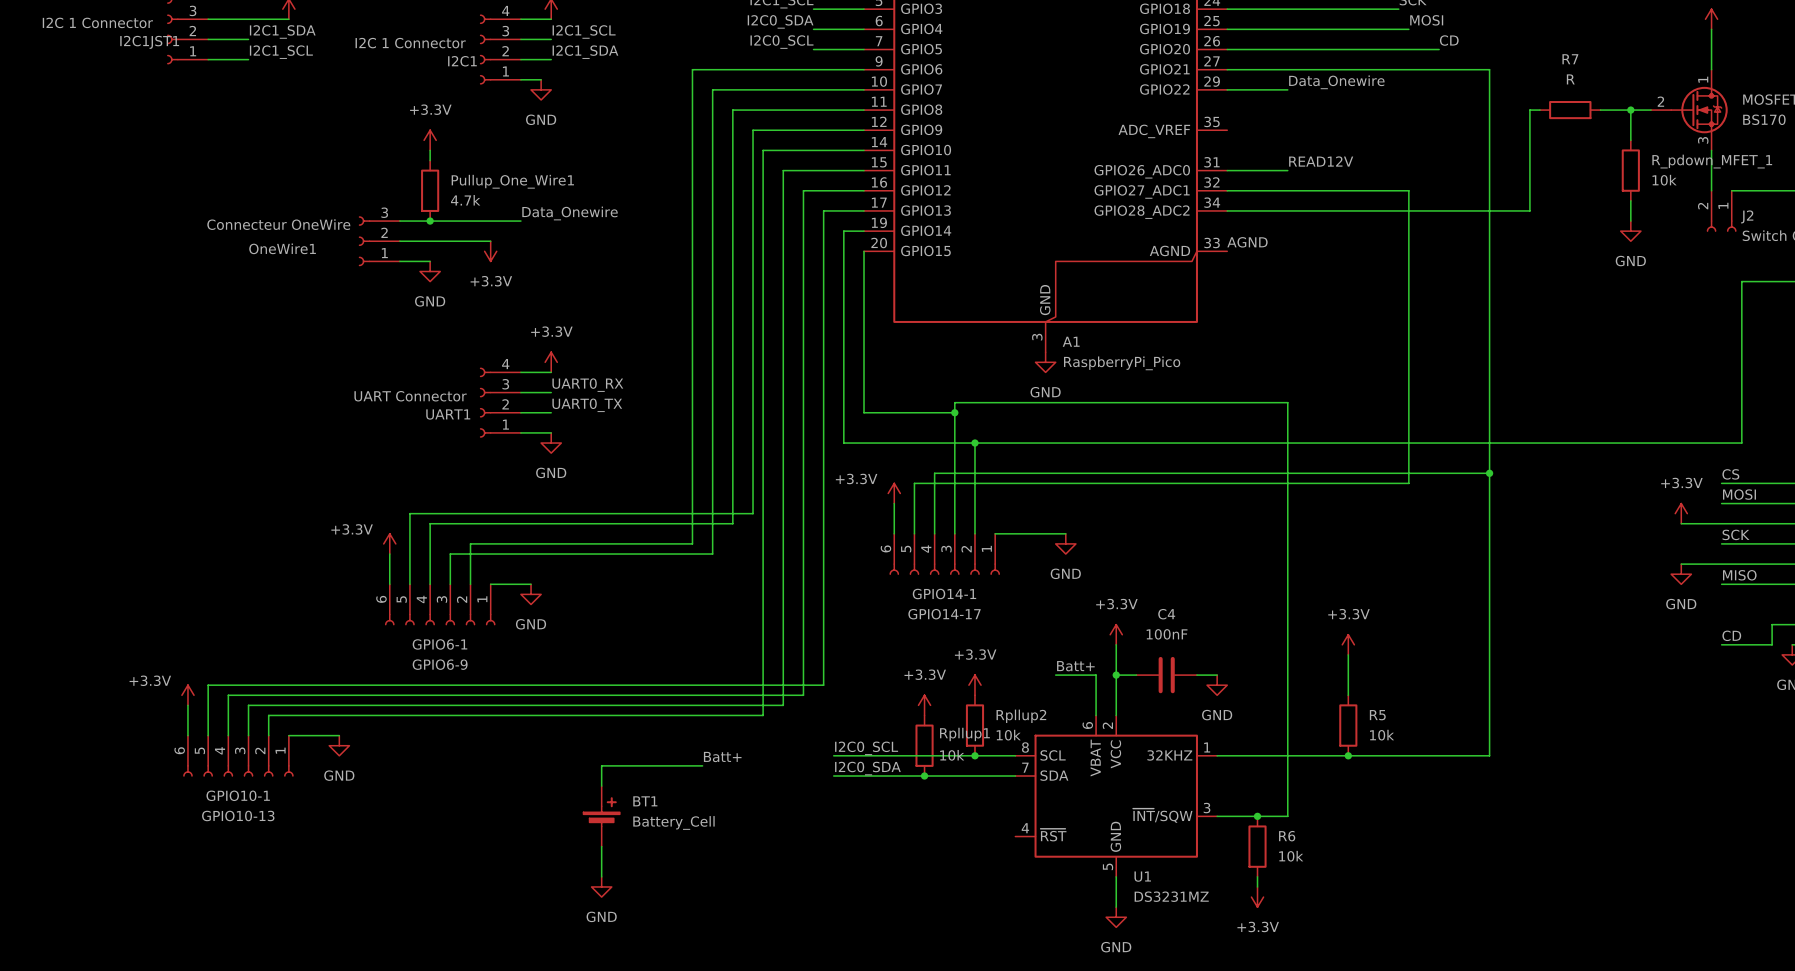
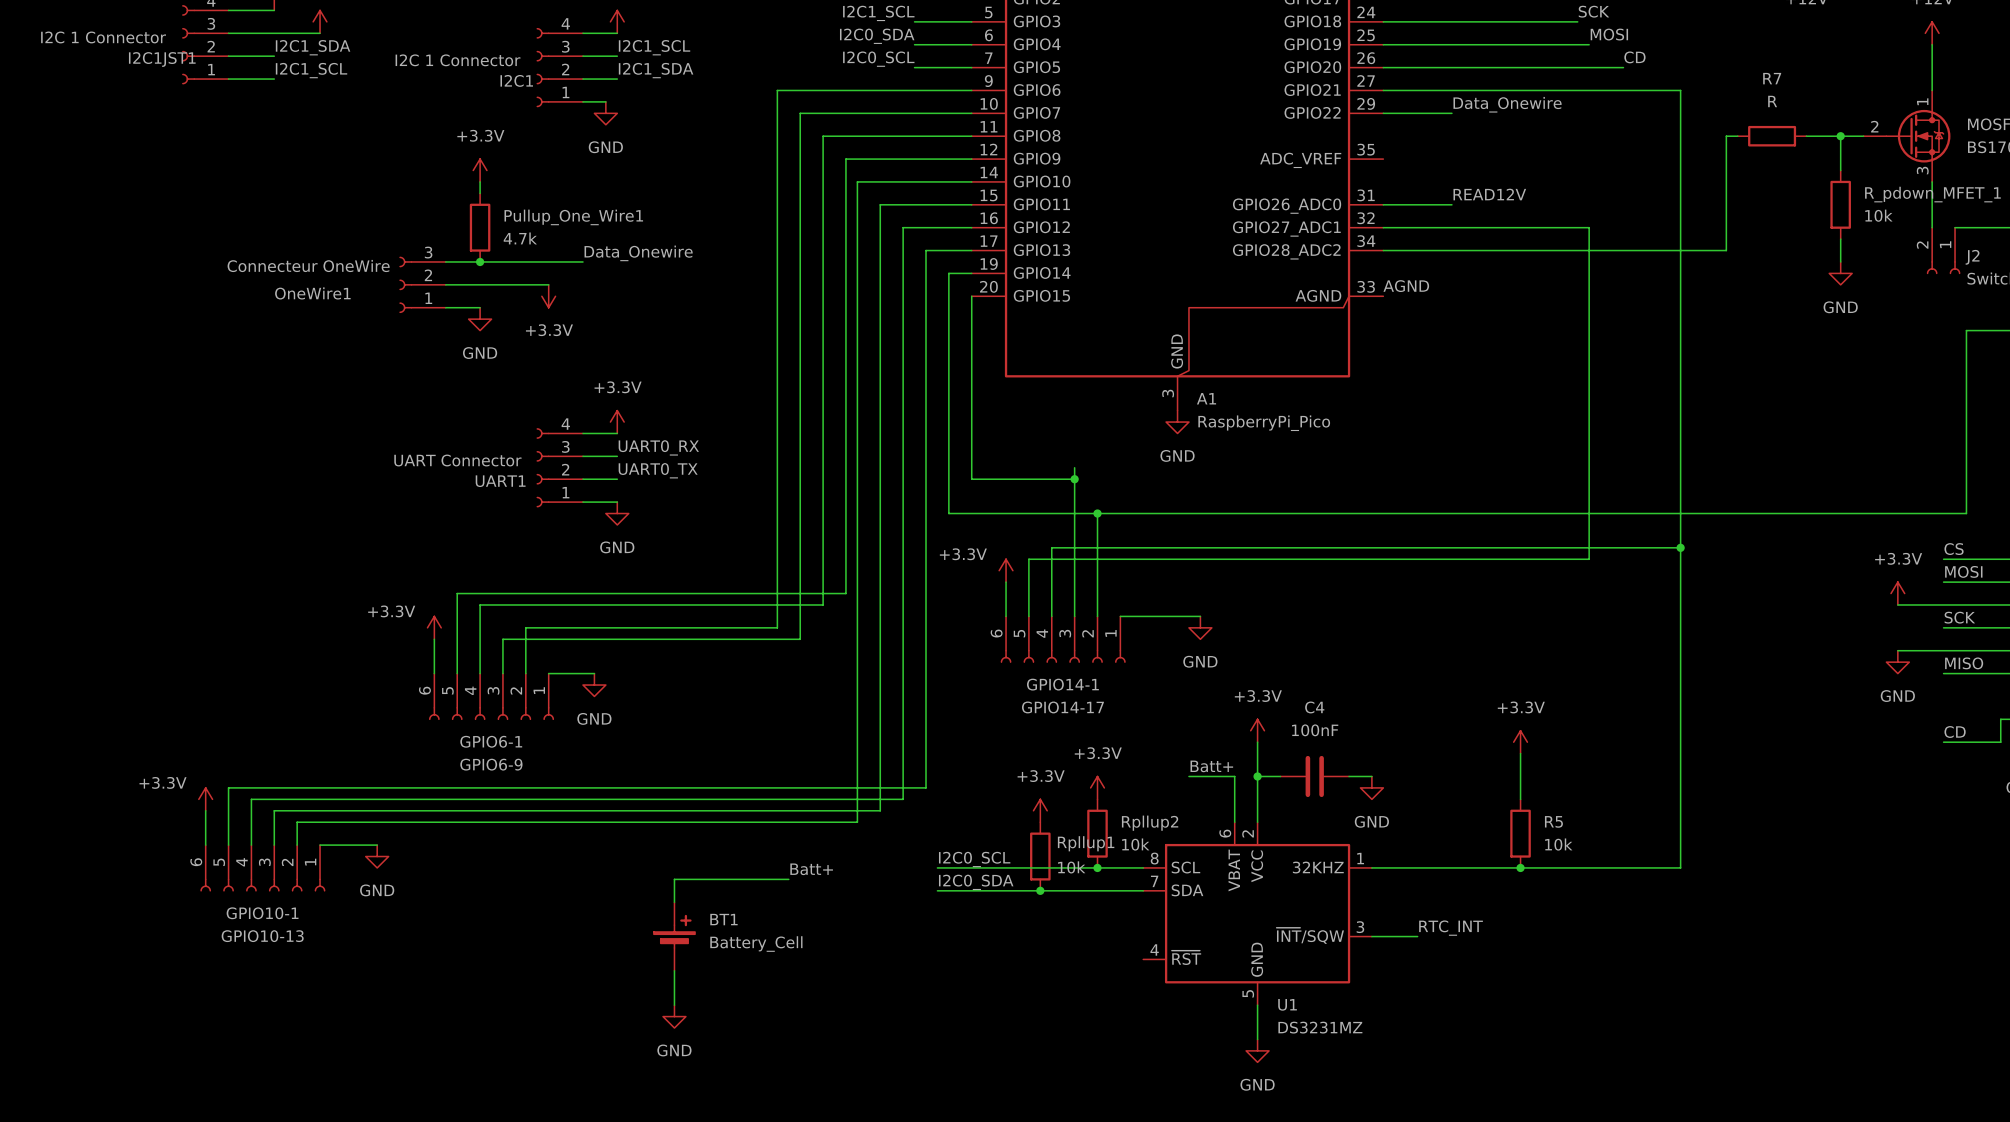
wire: (954, 402) (1287, 402) (1287, 816) (1257, 816) -> none
label: none -> RTC_INT (1451, 928)
junction: (1257, 816) -> none
R6: 10k (1257, 846) -> none
wire: (1257, 876) (1257, 886) -> none
power symbol: +3.3V (1257, 897) -> none

